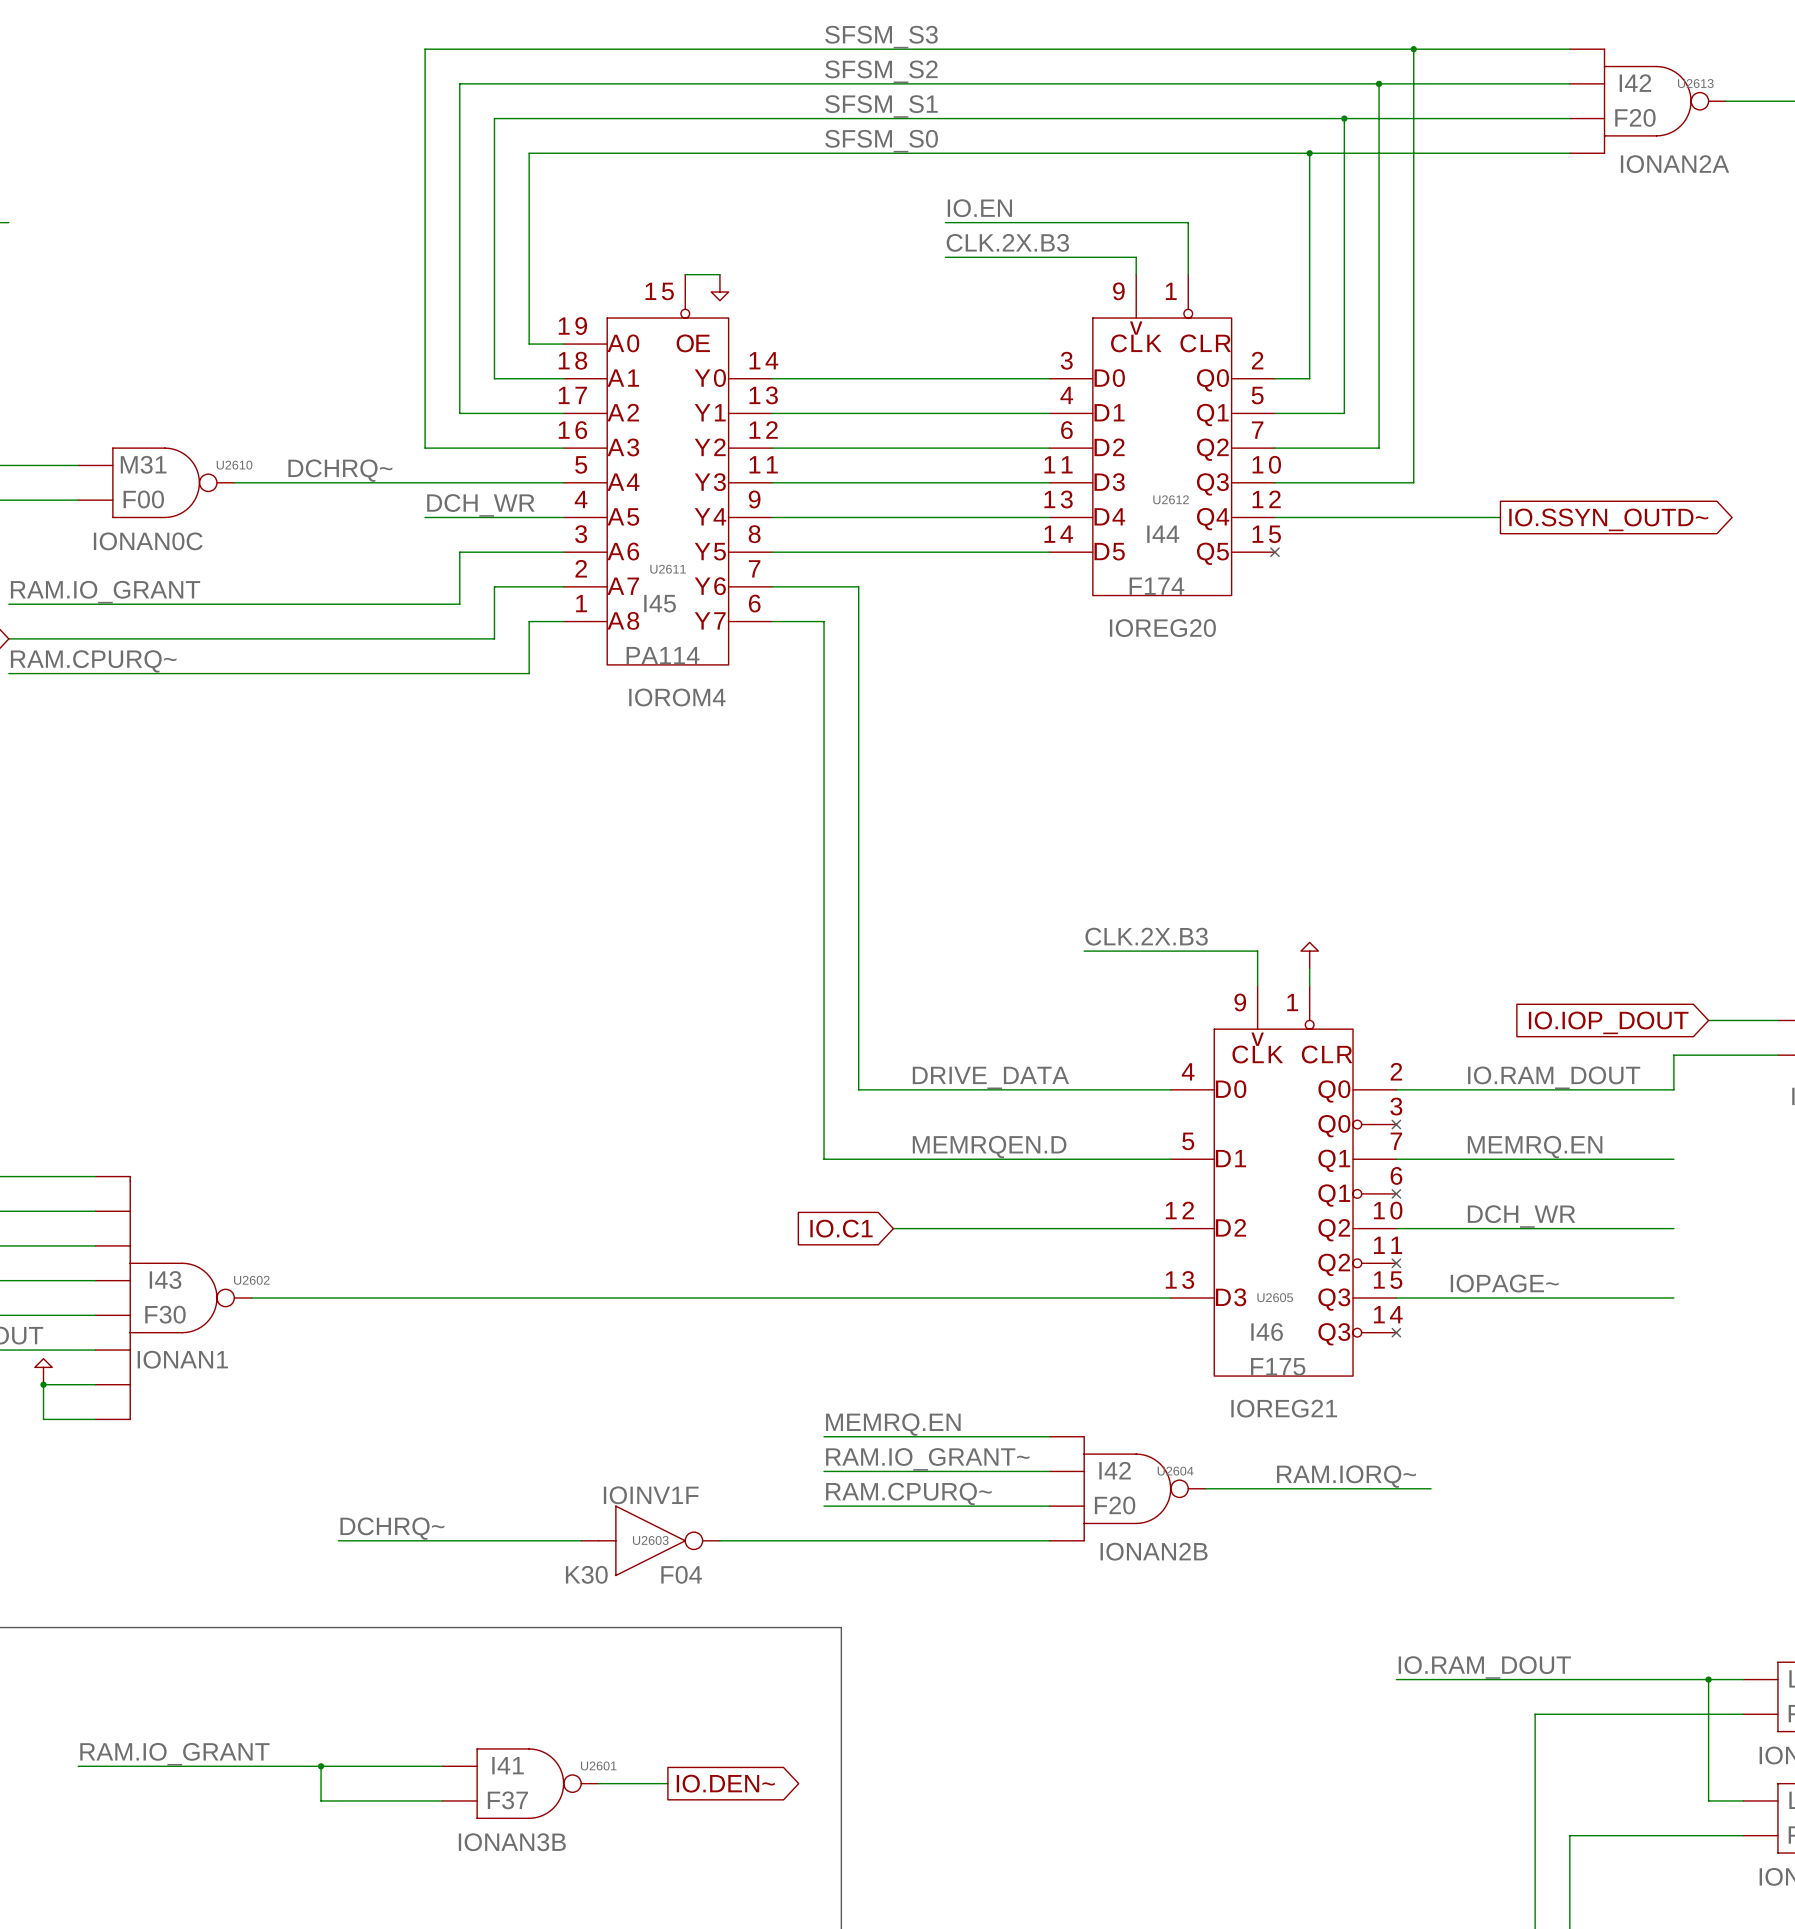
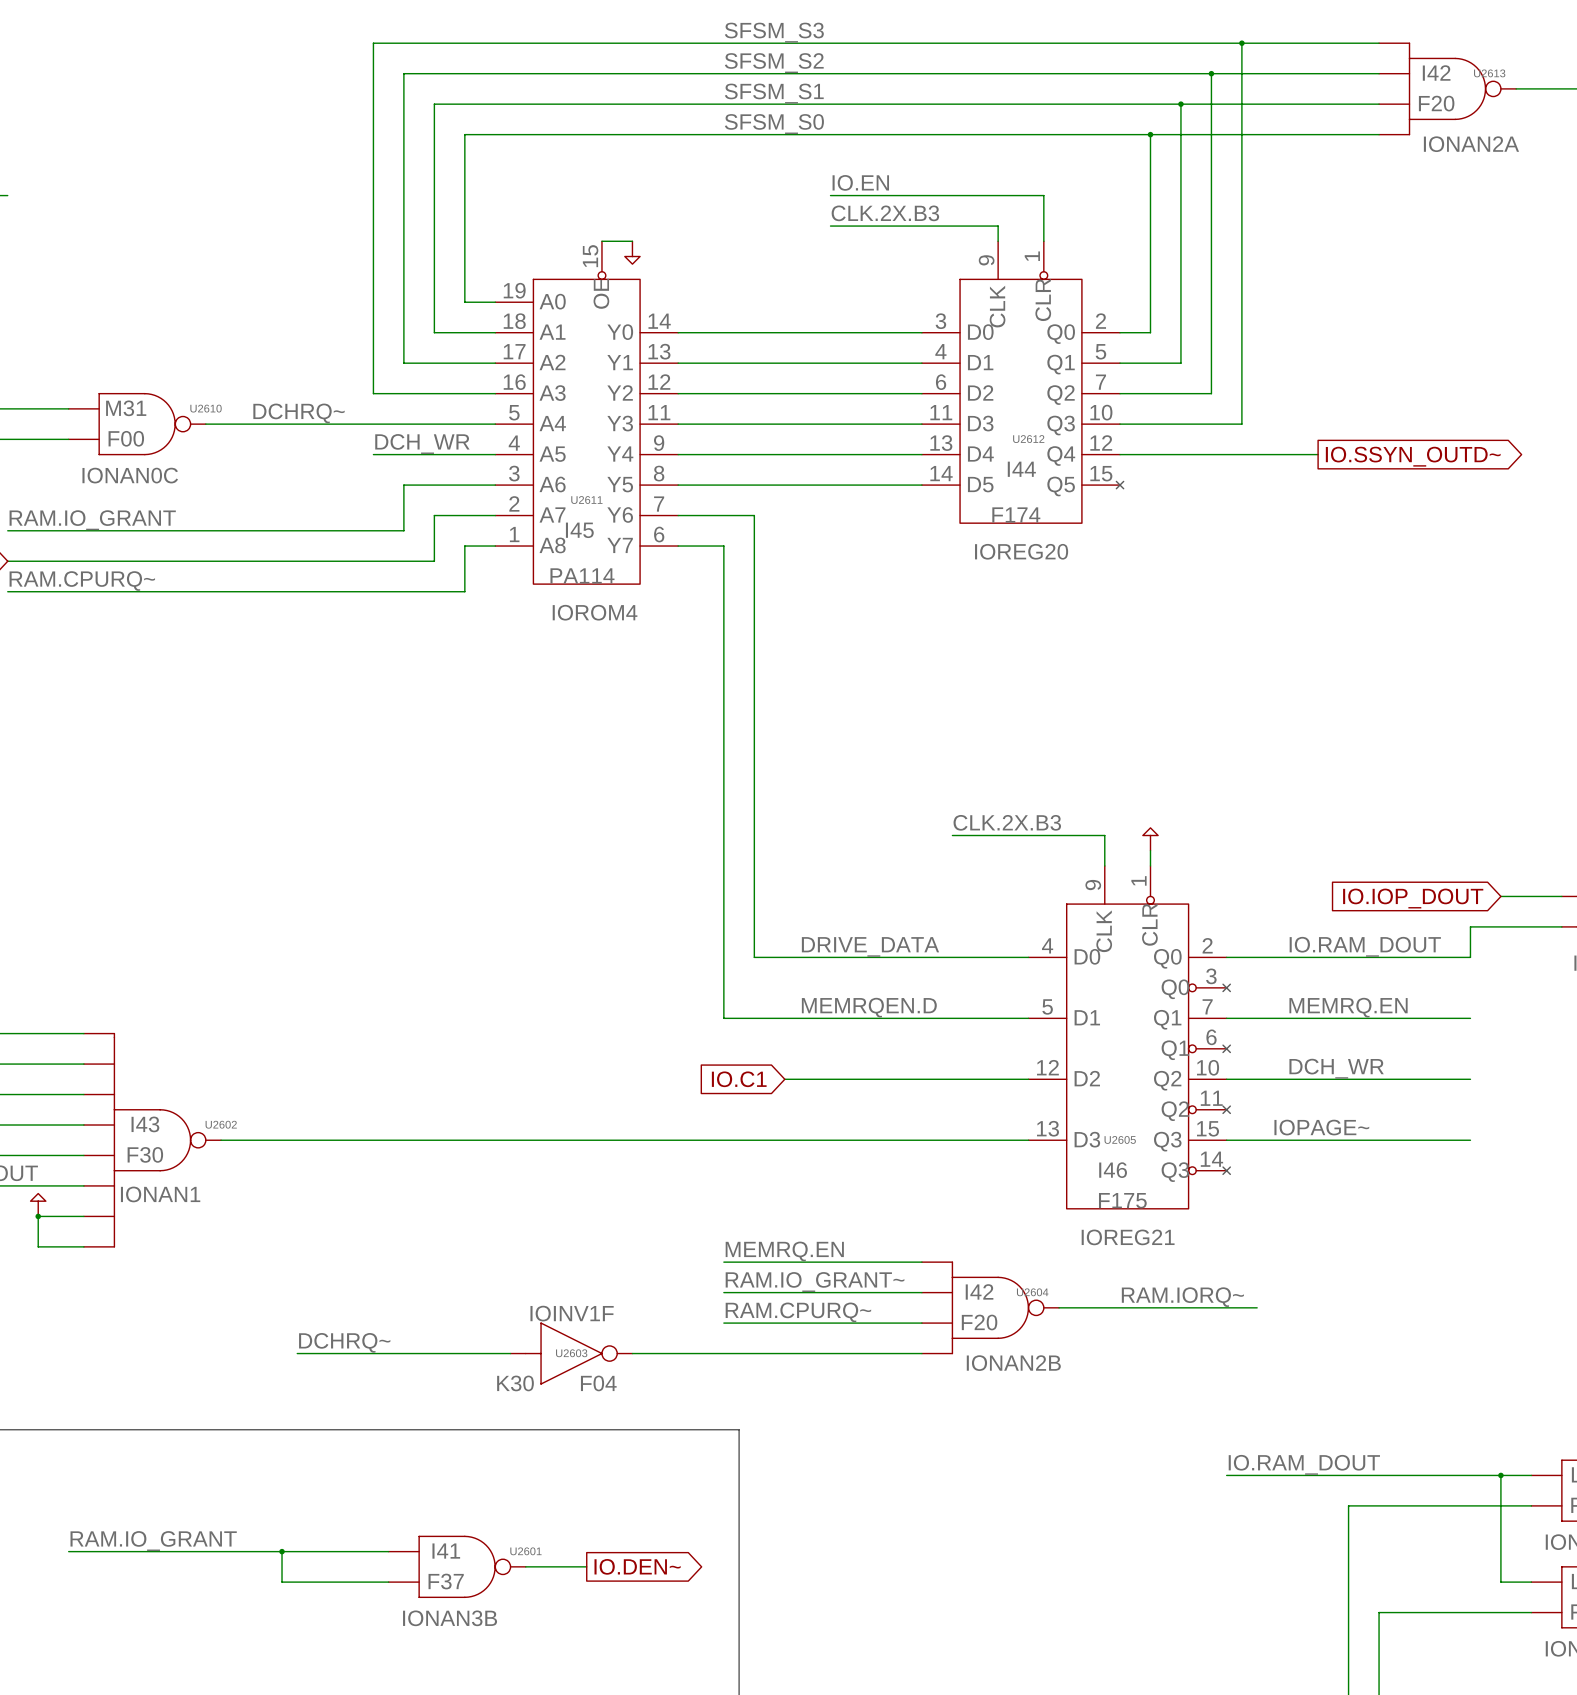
U2611 symbol: [563, 274, 772, 665] -> [495, 241, 679, 585]
U2612 symbol: [1049, 274, 1275, 596] -> [921, 241, 1121, 524]
U2605 symbol: [1170, 985, 1397, 1377] -> [1028, 865, 1227, 1209]

